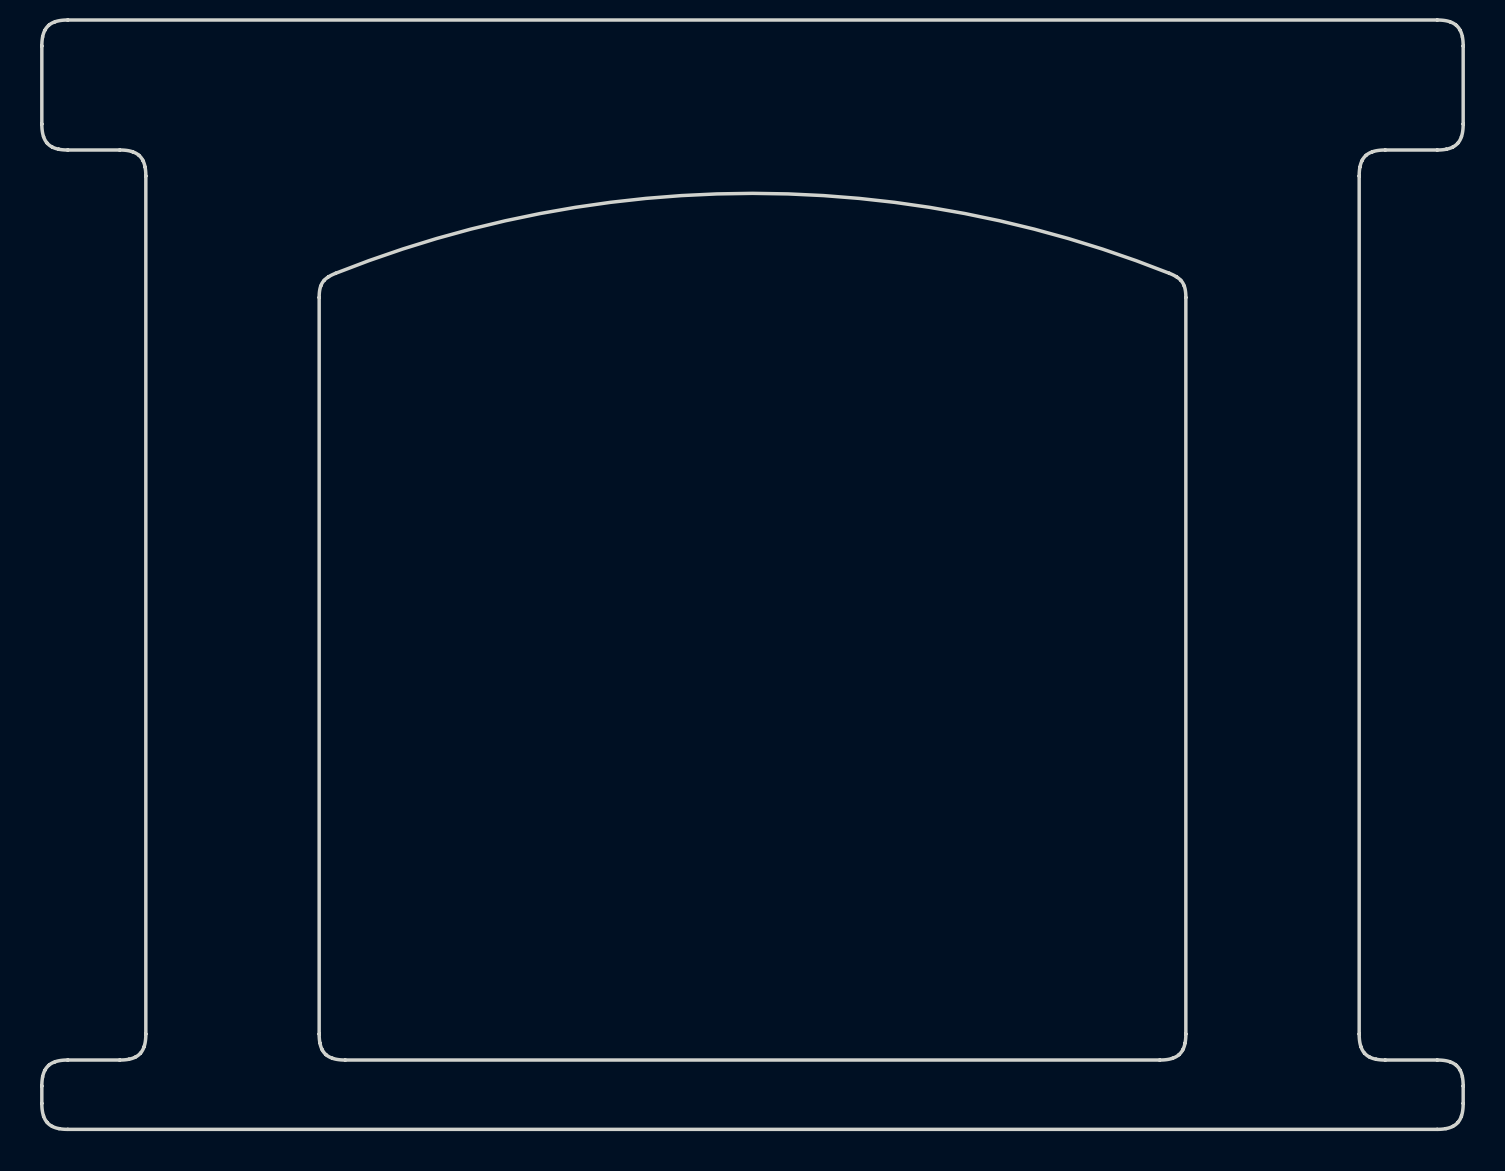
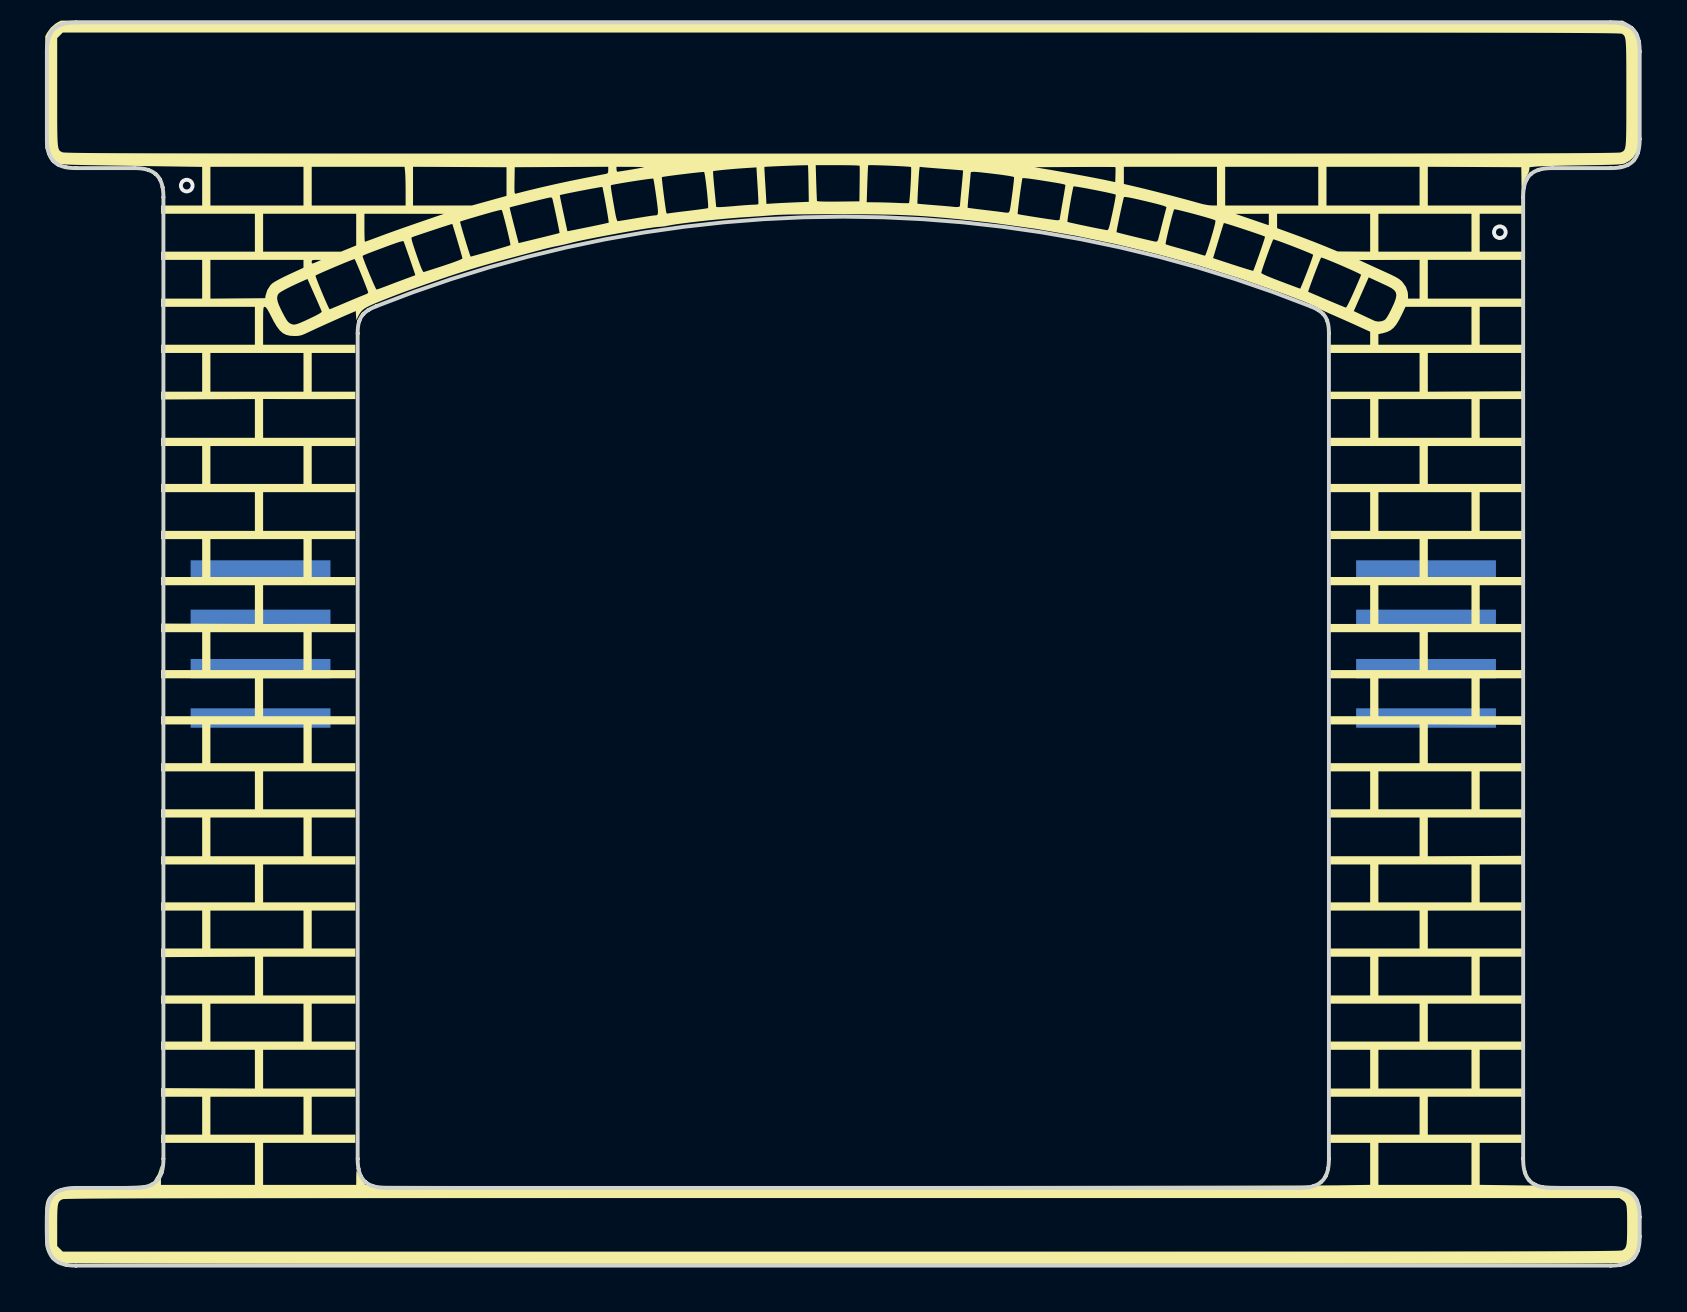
drawing: none -> [44, 20, 1639, 1264]
via: none -> (186, 185)
via: none -> (1499, 232)
part: none -> (260, 644)
part: none -> (1426, 644)

